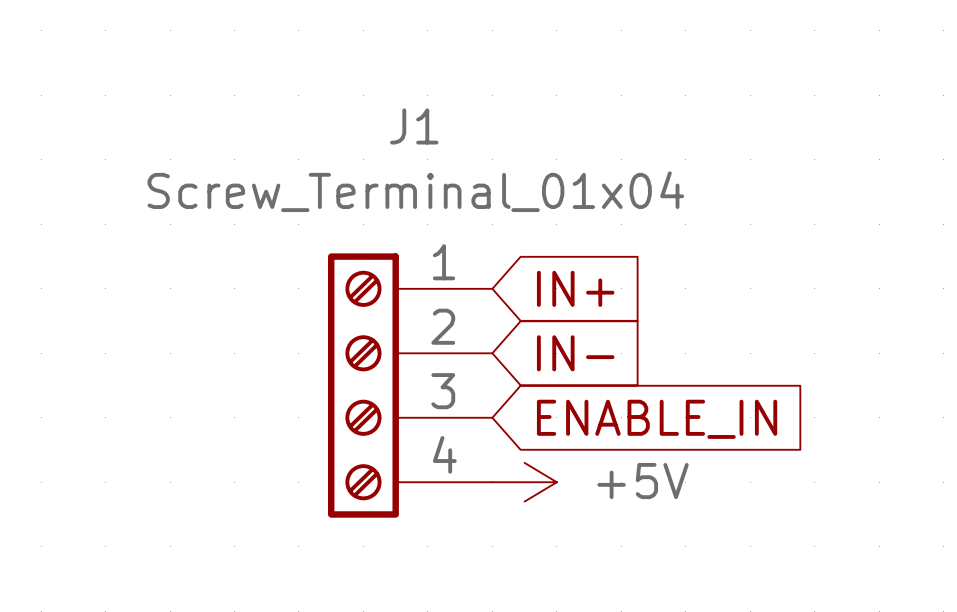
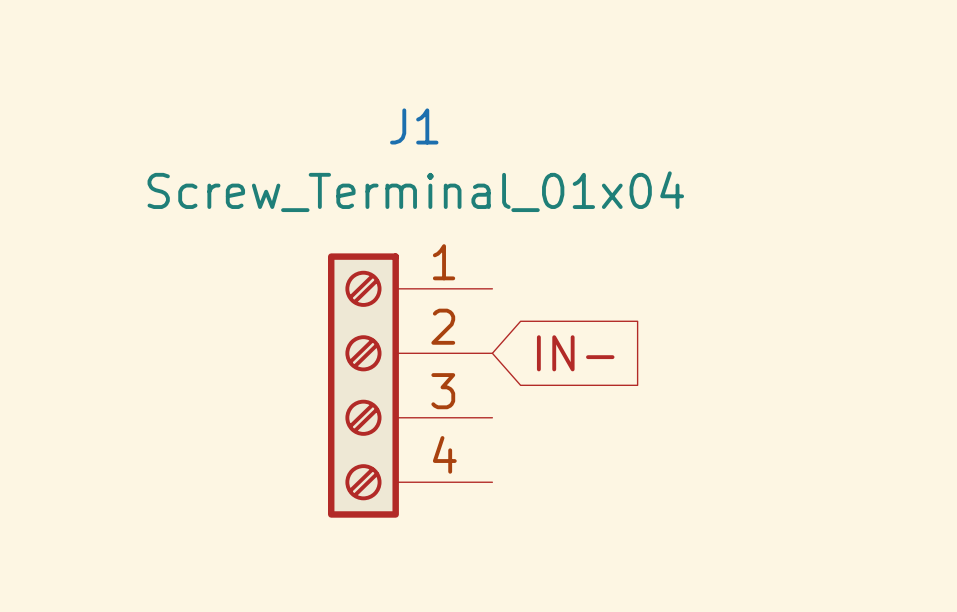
global label: IN+ (575, 288) -> none
global label: ENABLE_IN (657, 419) -> none
power symbol: +5V (524, 482) -> none

